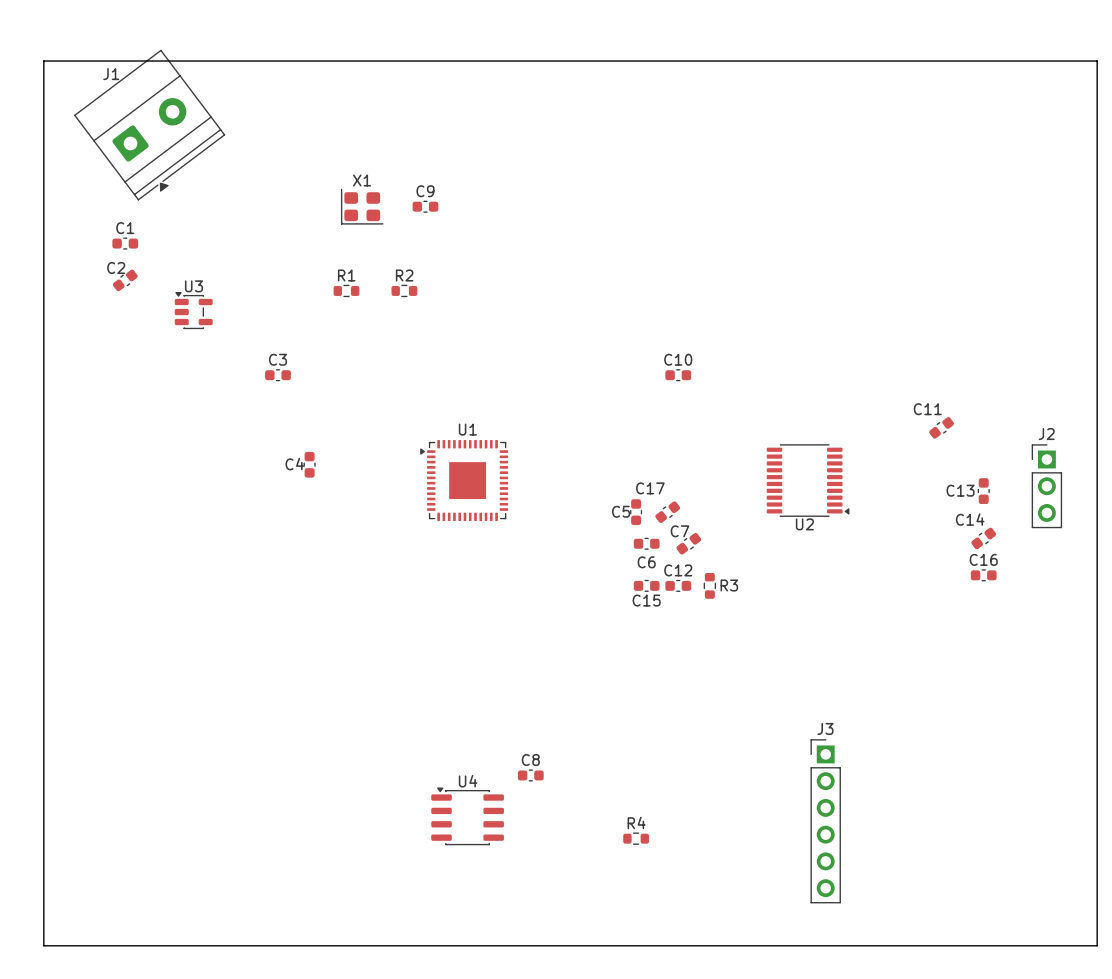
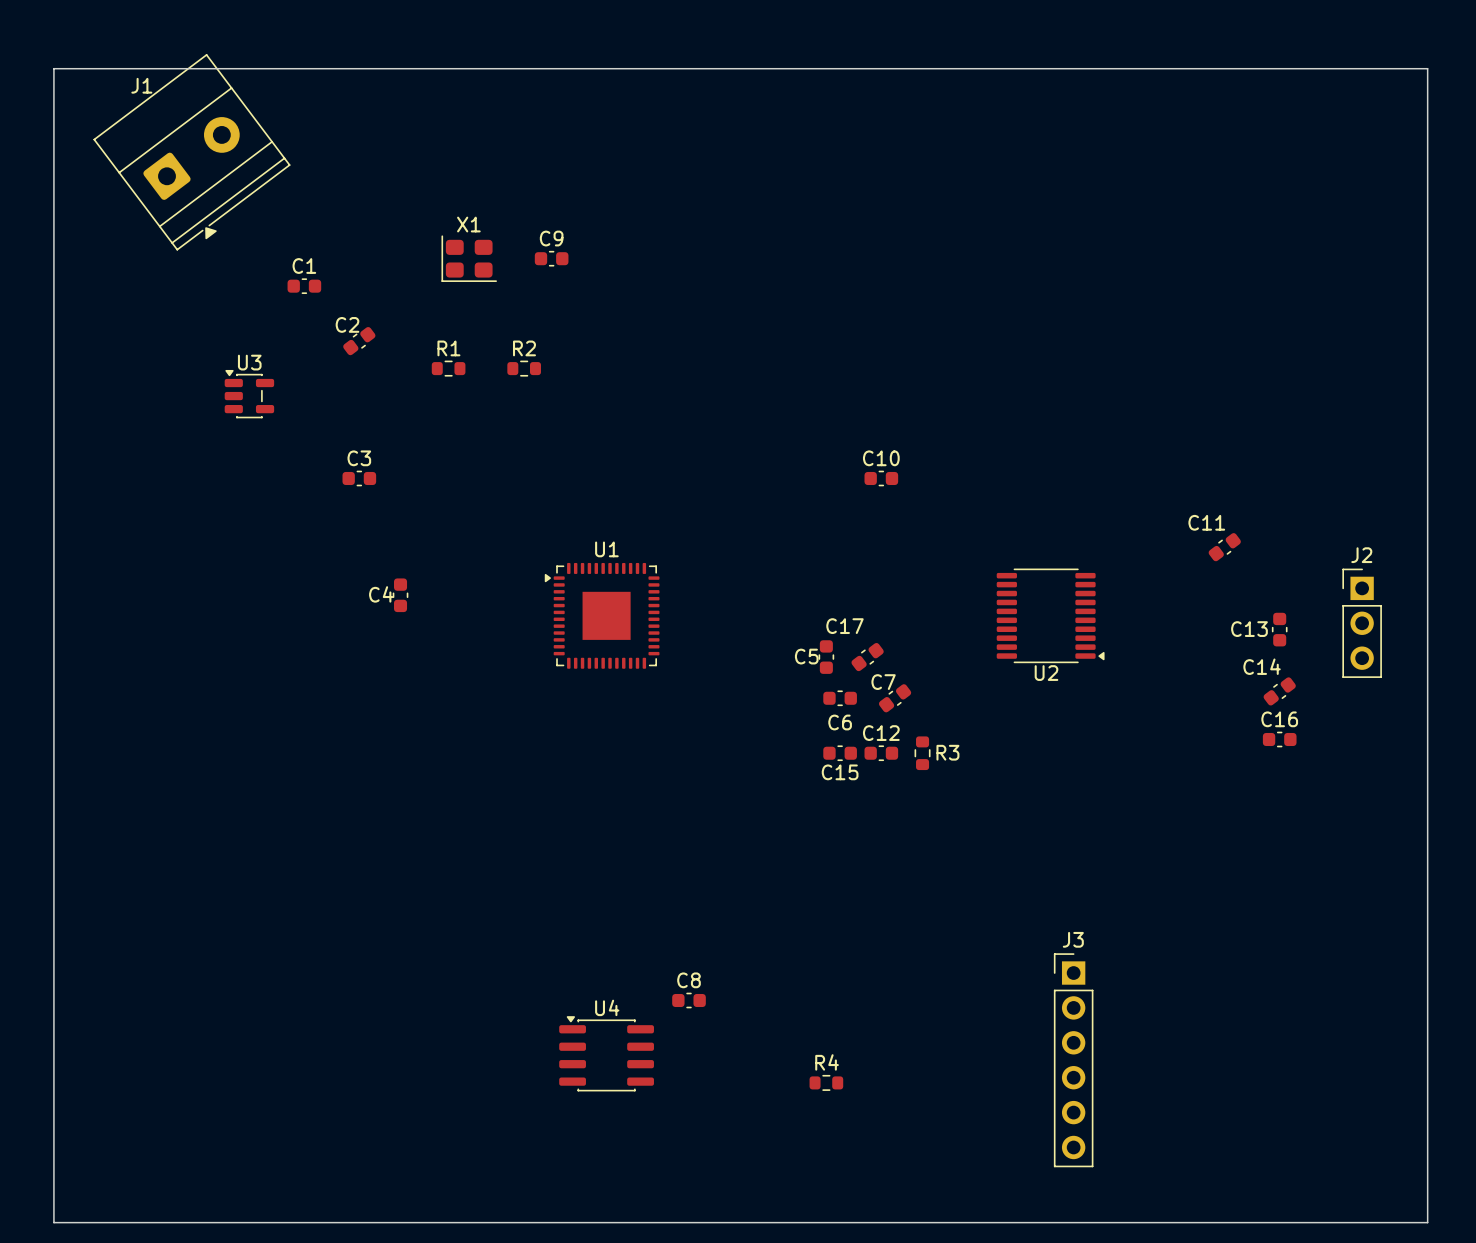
C1 position: (125, 243) -> (304, 286)
C2 position: (125, 280) -> (359, 341)

